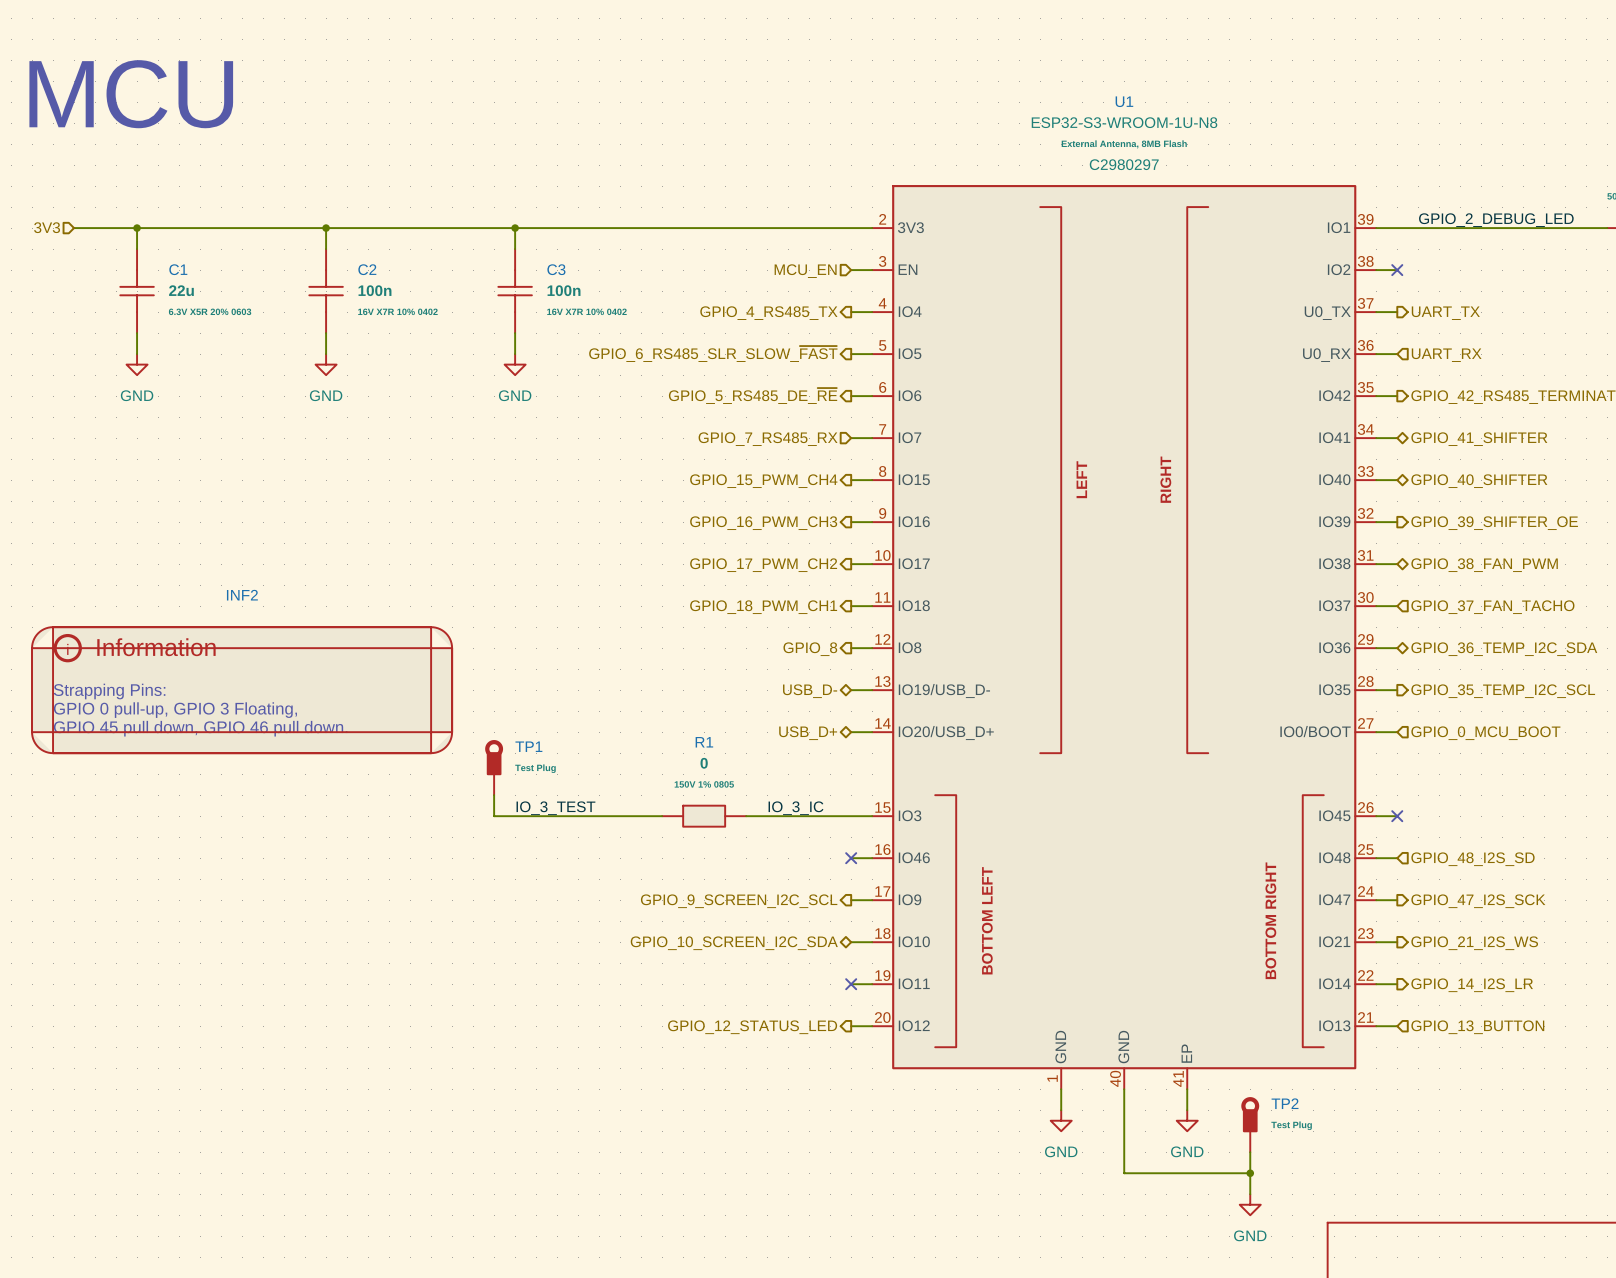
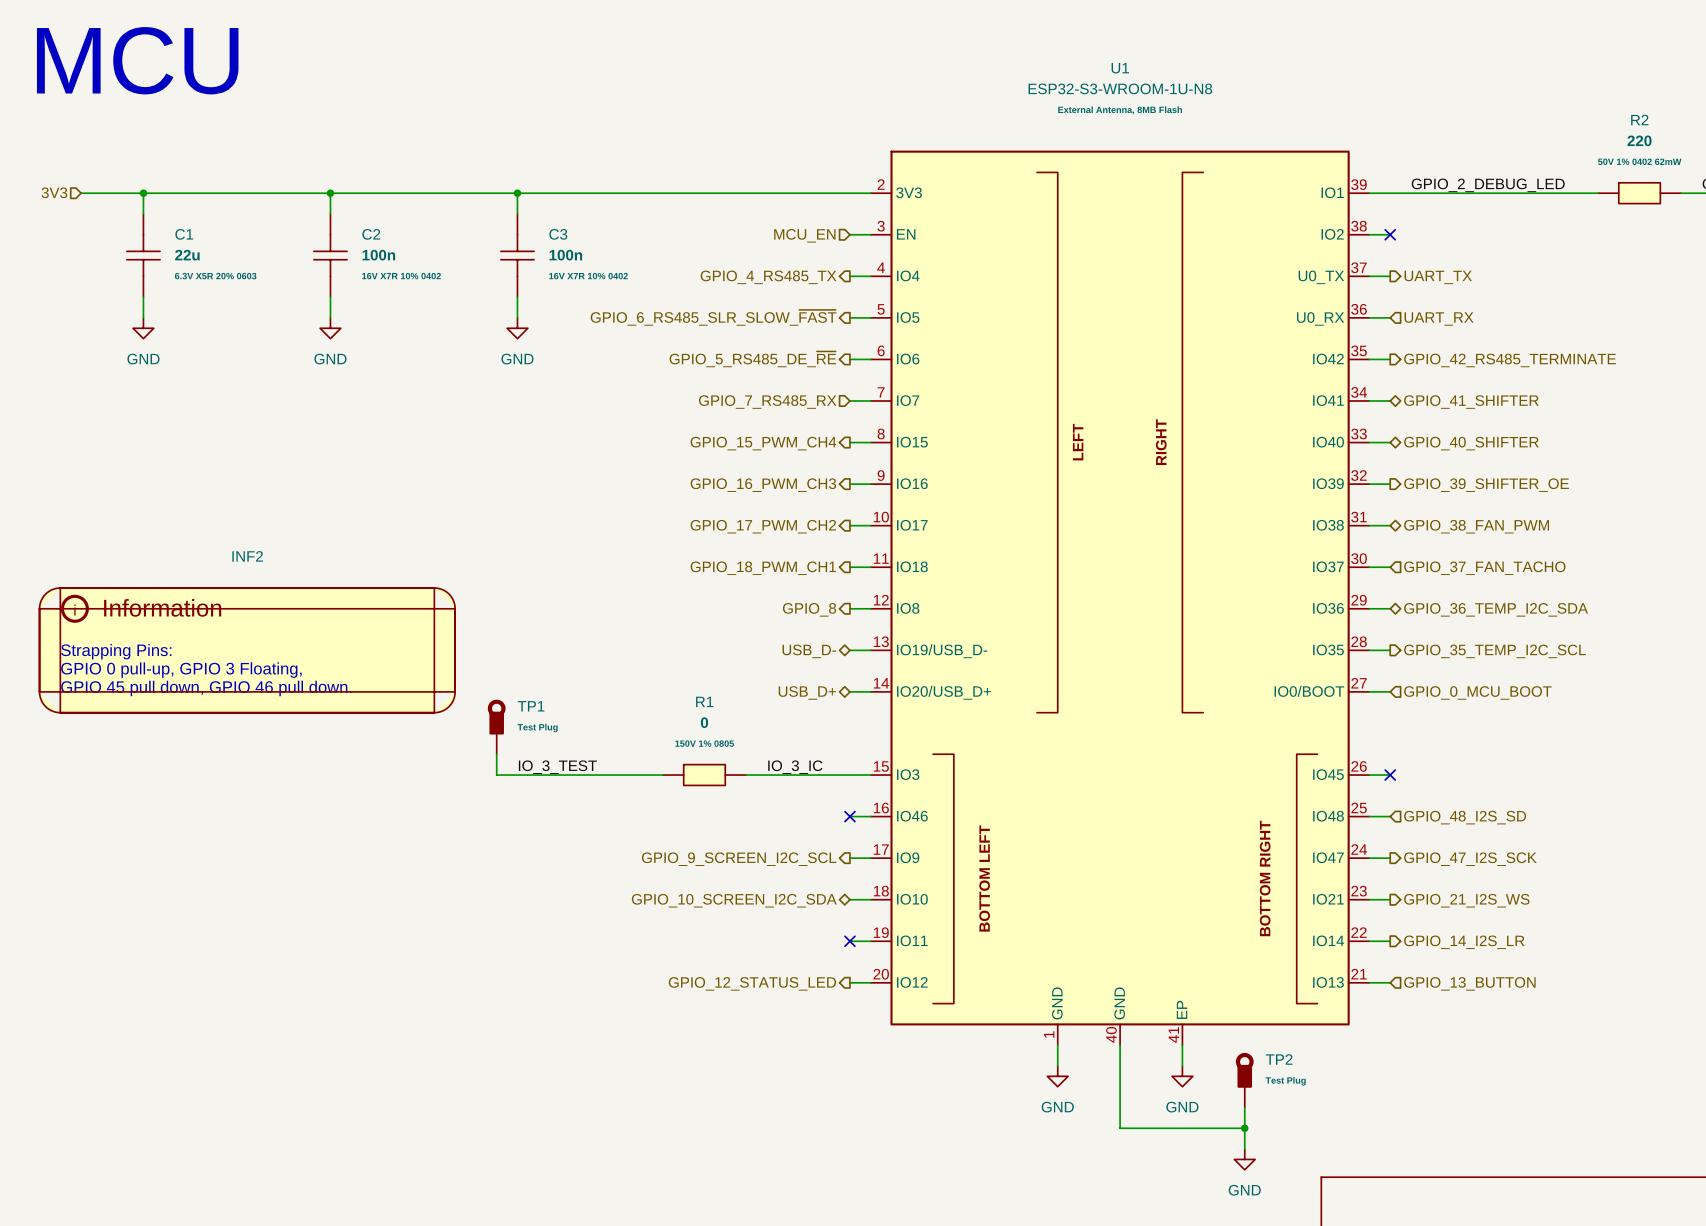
U1 text: C2980297 (1124, 164) -> none

